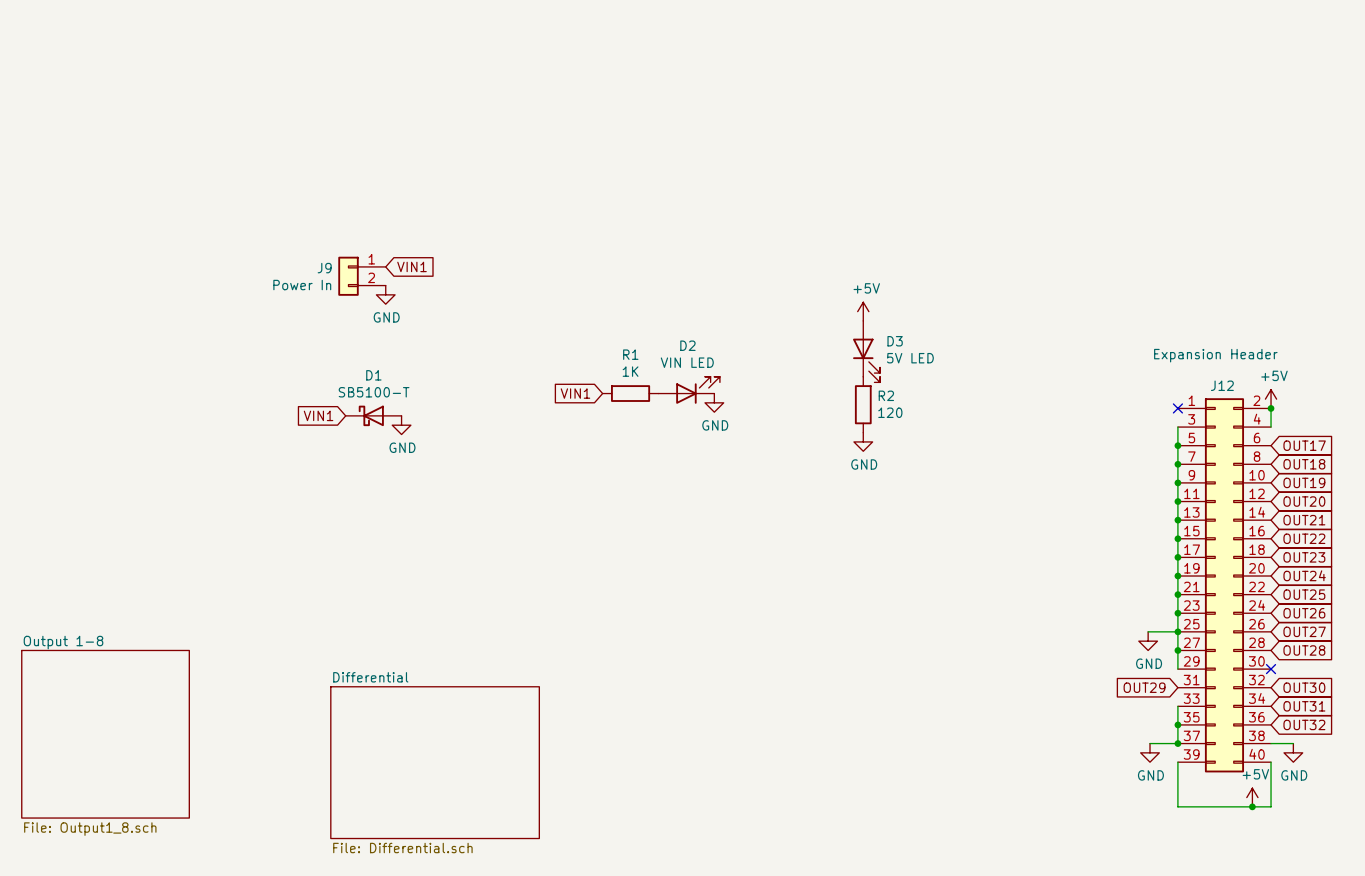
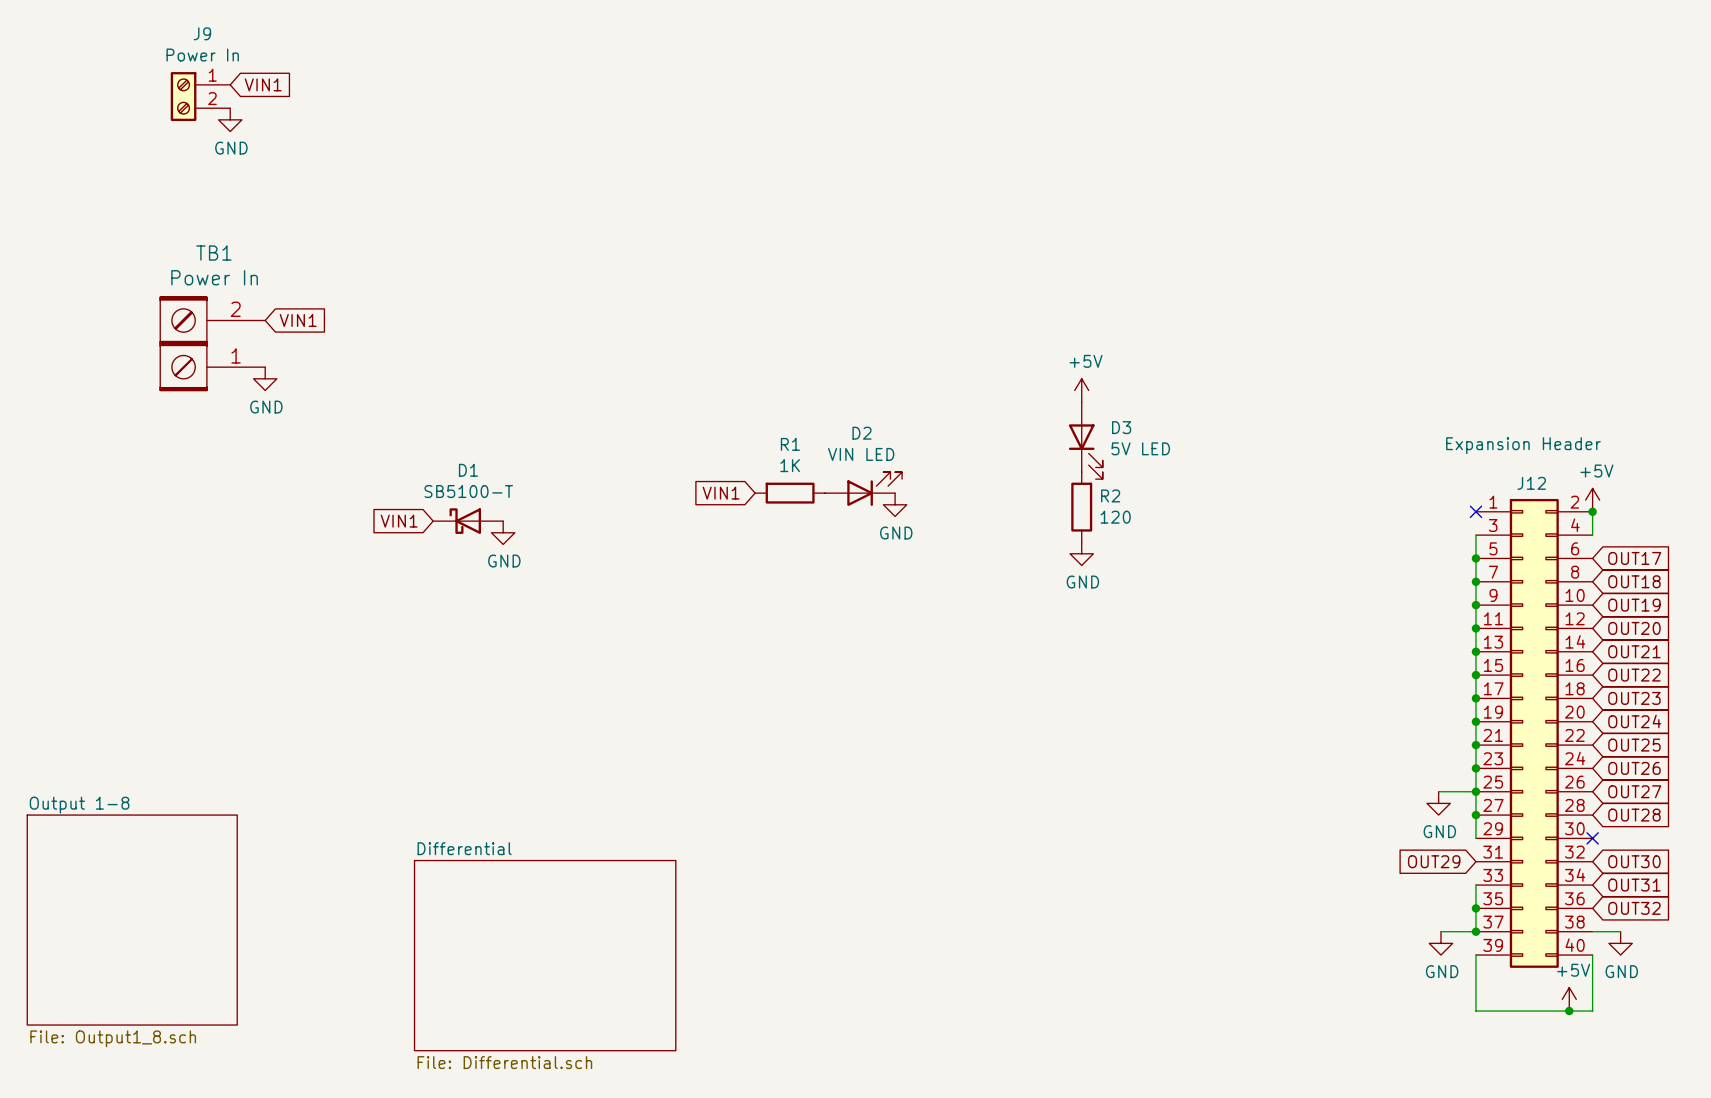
global label: none -> VIN1 (263, 84)
power symbol: none -> GND (230, 119)
global label: none -> VIN1 (298, 320)
J9 symbol: [338, 256, 386, 296] -> [170, 72, 231, 122]
global label: VIN1 (412, 266) -> none
J9 name position: J9 (324, 268) -> J9 (202, 33)
TB1: none -> Power In (212, 343)
J9 value position: Power In (302, 285) -> Power In (202, 55)
power symbol: GND (385, 294) -> none
power symbol: none -> GND (265, 378)

